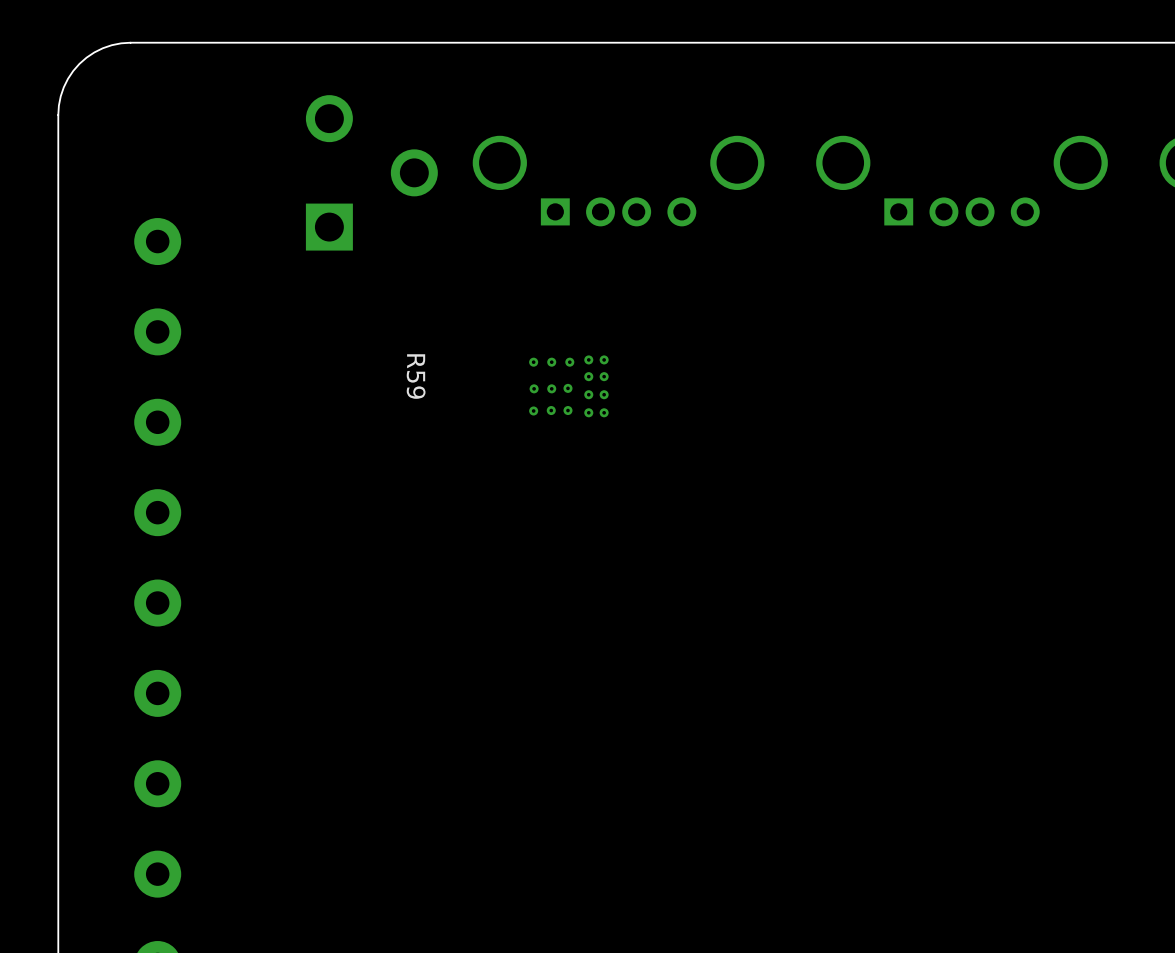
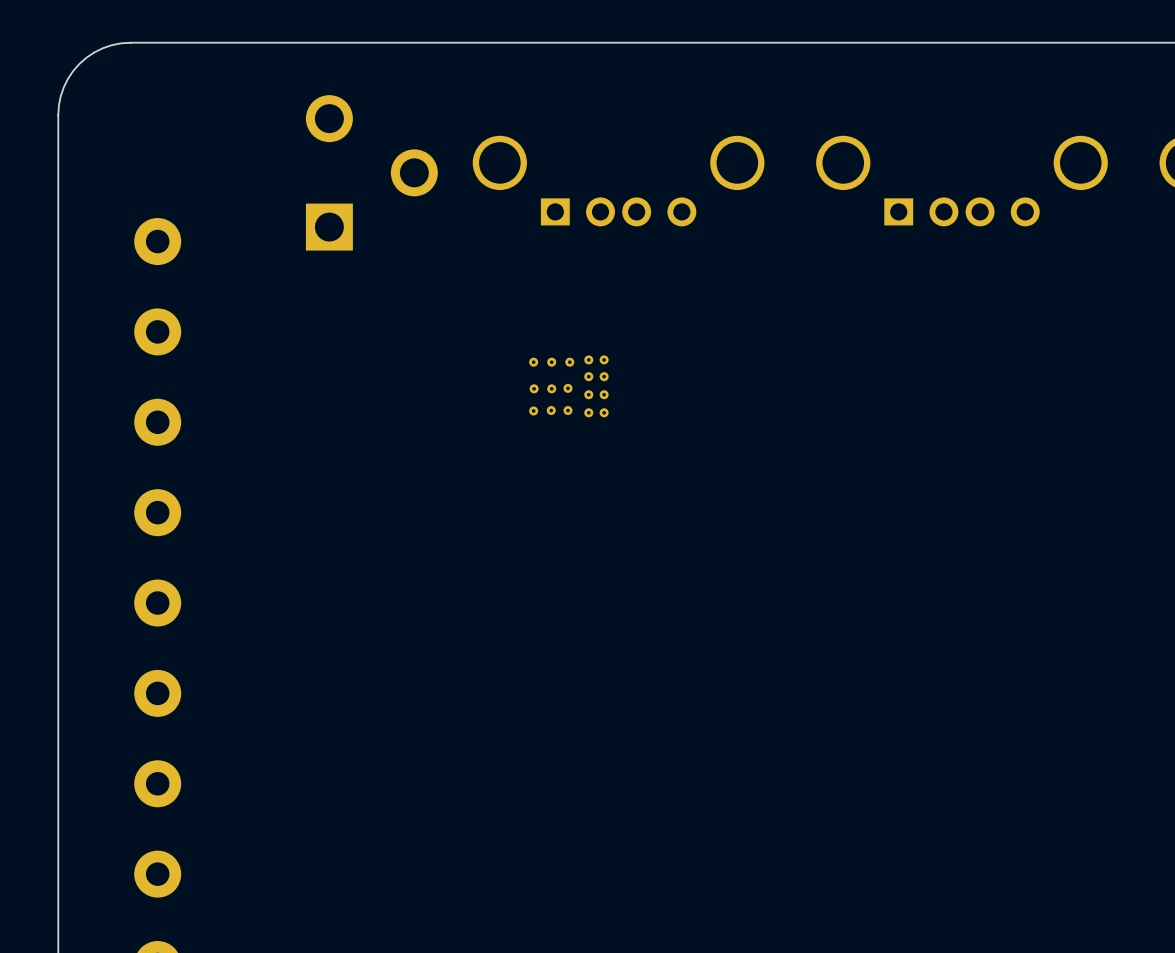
R59: (416, 376) -> none

